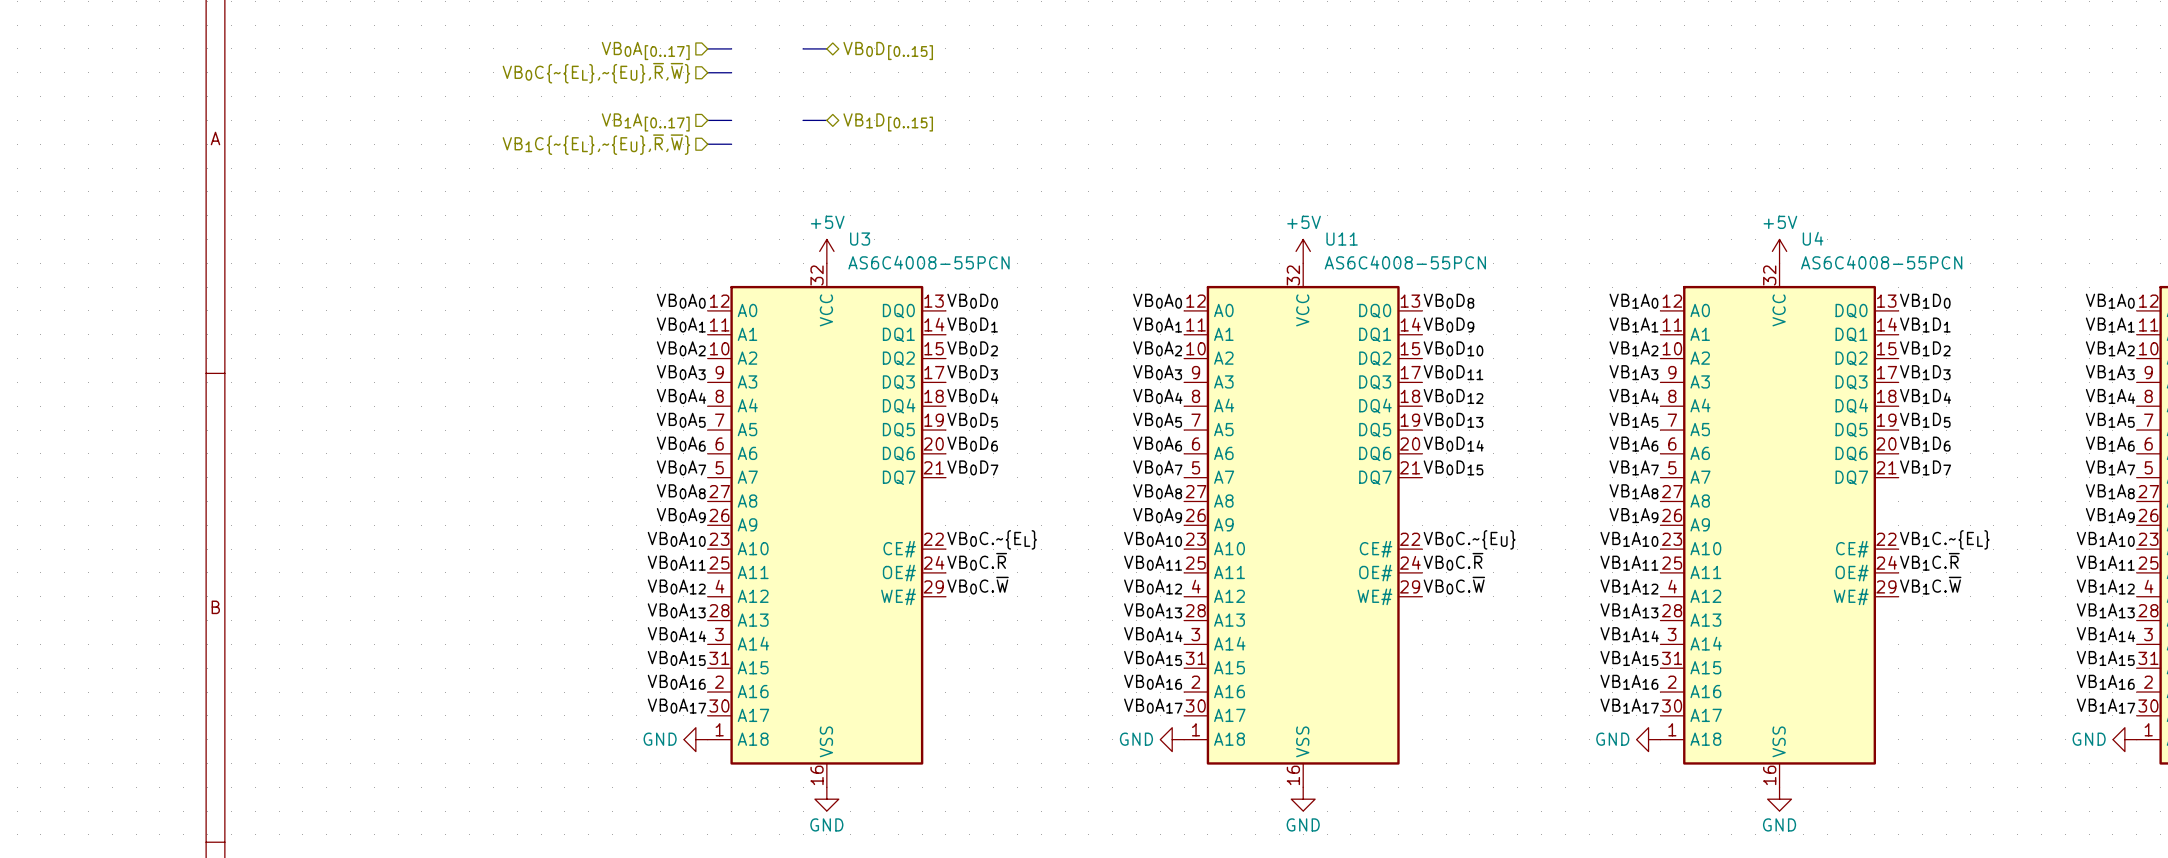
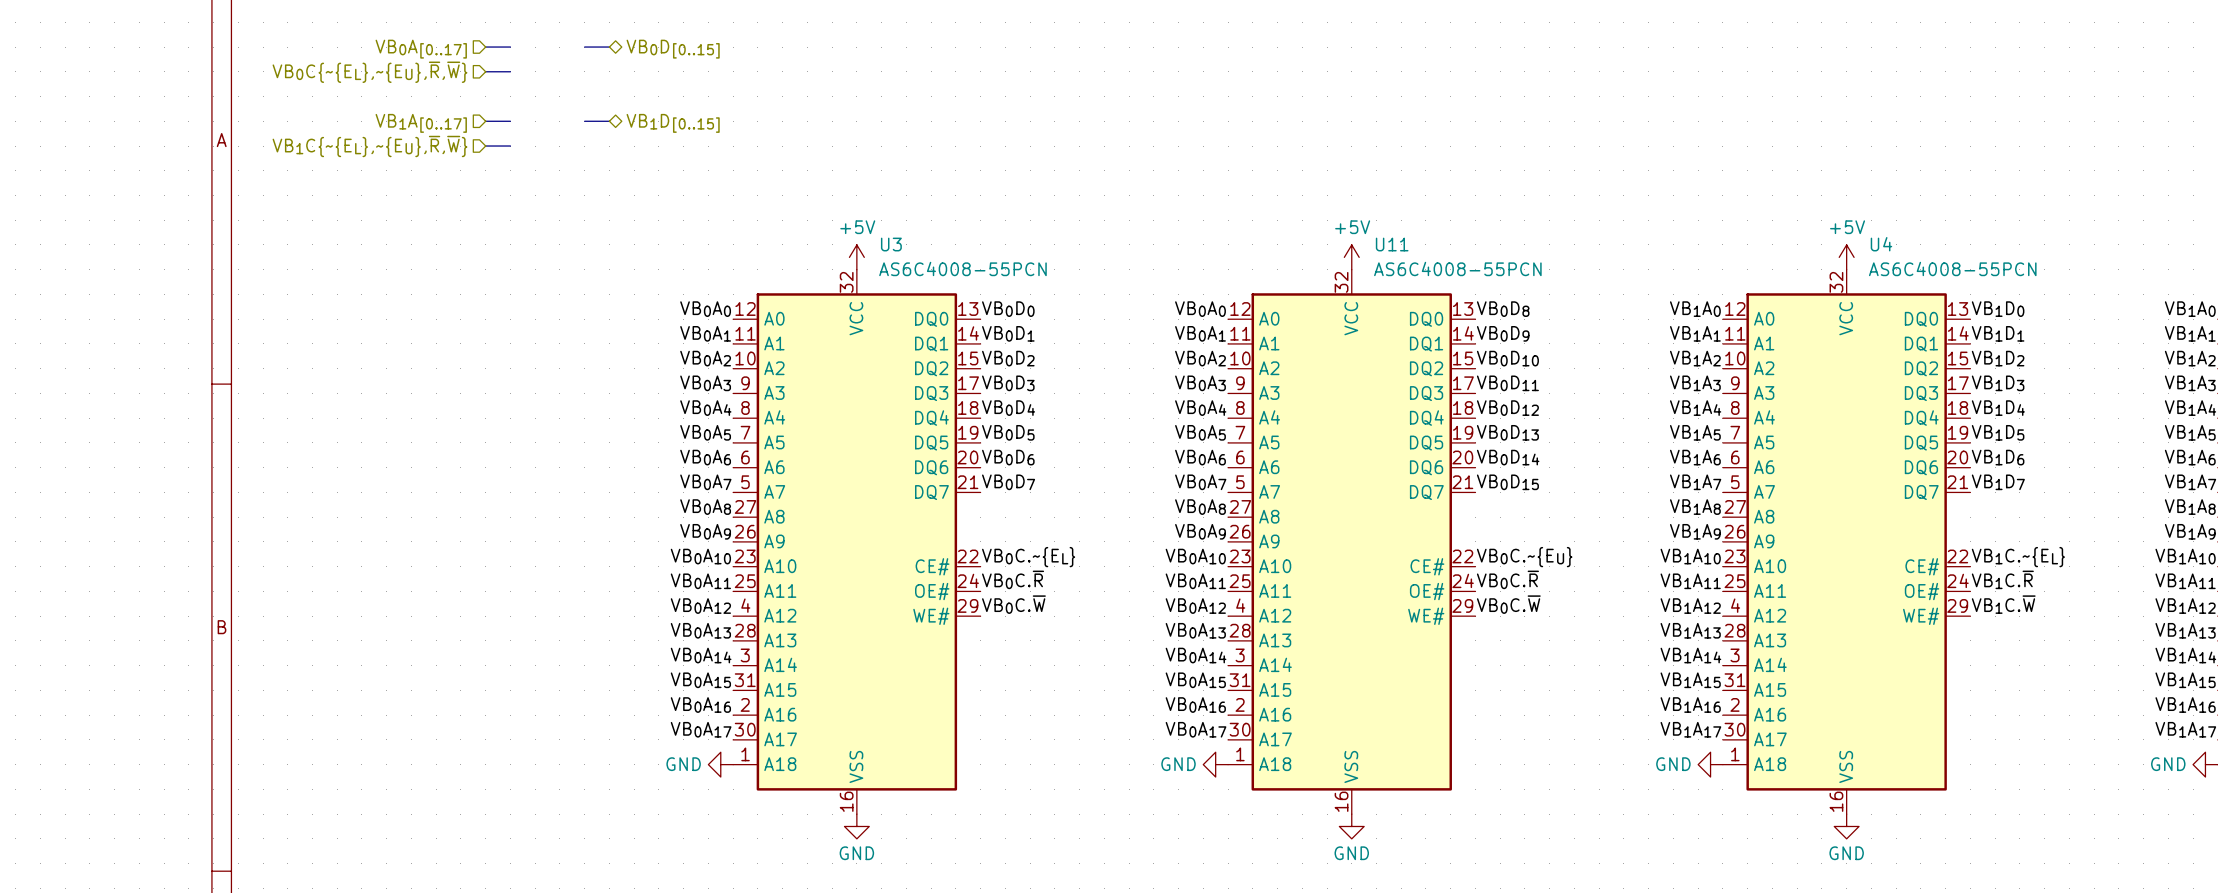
bus: none -> (485, 47) (510, 47)
bus: (707, 48) (731, 48) -> (584, 47) (609, 47)
bus: (803, 48) (826, 48) -> none
hierarchical label: none -> VB0A[0..17] (421, 49)
hierarchical label shape: input (645, 50) -> bidirectional (673, 49)
hierarchical label: VB0A[0..17] (645, 50) -> VB0D[0..15] (673, 49)
hierarchical label: VB0D[0..15] (888, 50) -> none
bus: none -> (485, 71) (510, 71)
bus: (707, 72) (731, 72) -> none
hierarchical label: none -> VB0C{~{EL},~{EU},~{R},~{W}} (369, 72)
hierarchical label: VB0C{~{EL},~{EU},~{R},~{W}} (596, 73) -> none
bus: none -> (485, 121) (510, 121)
bus: (707, 120) (731, 120) -> (584, 121) (609, 121)
bus: (803, 120) (826, 120) -> none
hierarchical label: none -> VB1A[0..17] (421, 123)
hierarchical label shape: input (645, 122) -> bidirectional (673, 123)
hierarchical label: VB1A[0..17] (645, 122) -> VB1D[0..15] (673, 123)
hierarchical label: VB1D[0..15] (888, 122) -> none
hierarchical label: none -> VB1C{~{EL},~{EU},~{R},~{W}} (369, 146)
bus: none -> (485, 146) (510, 146)
hierarchical label: VB1C{~{EL},~{EU},~{R},~{W}} (596, 144) -> none
bus: (707, 144) (731, 144) -> none

